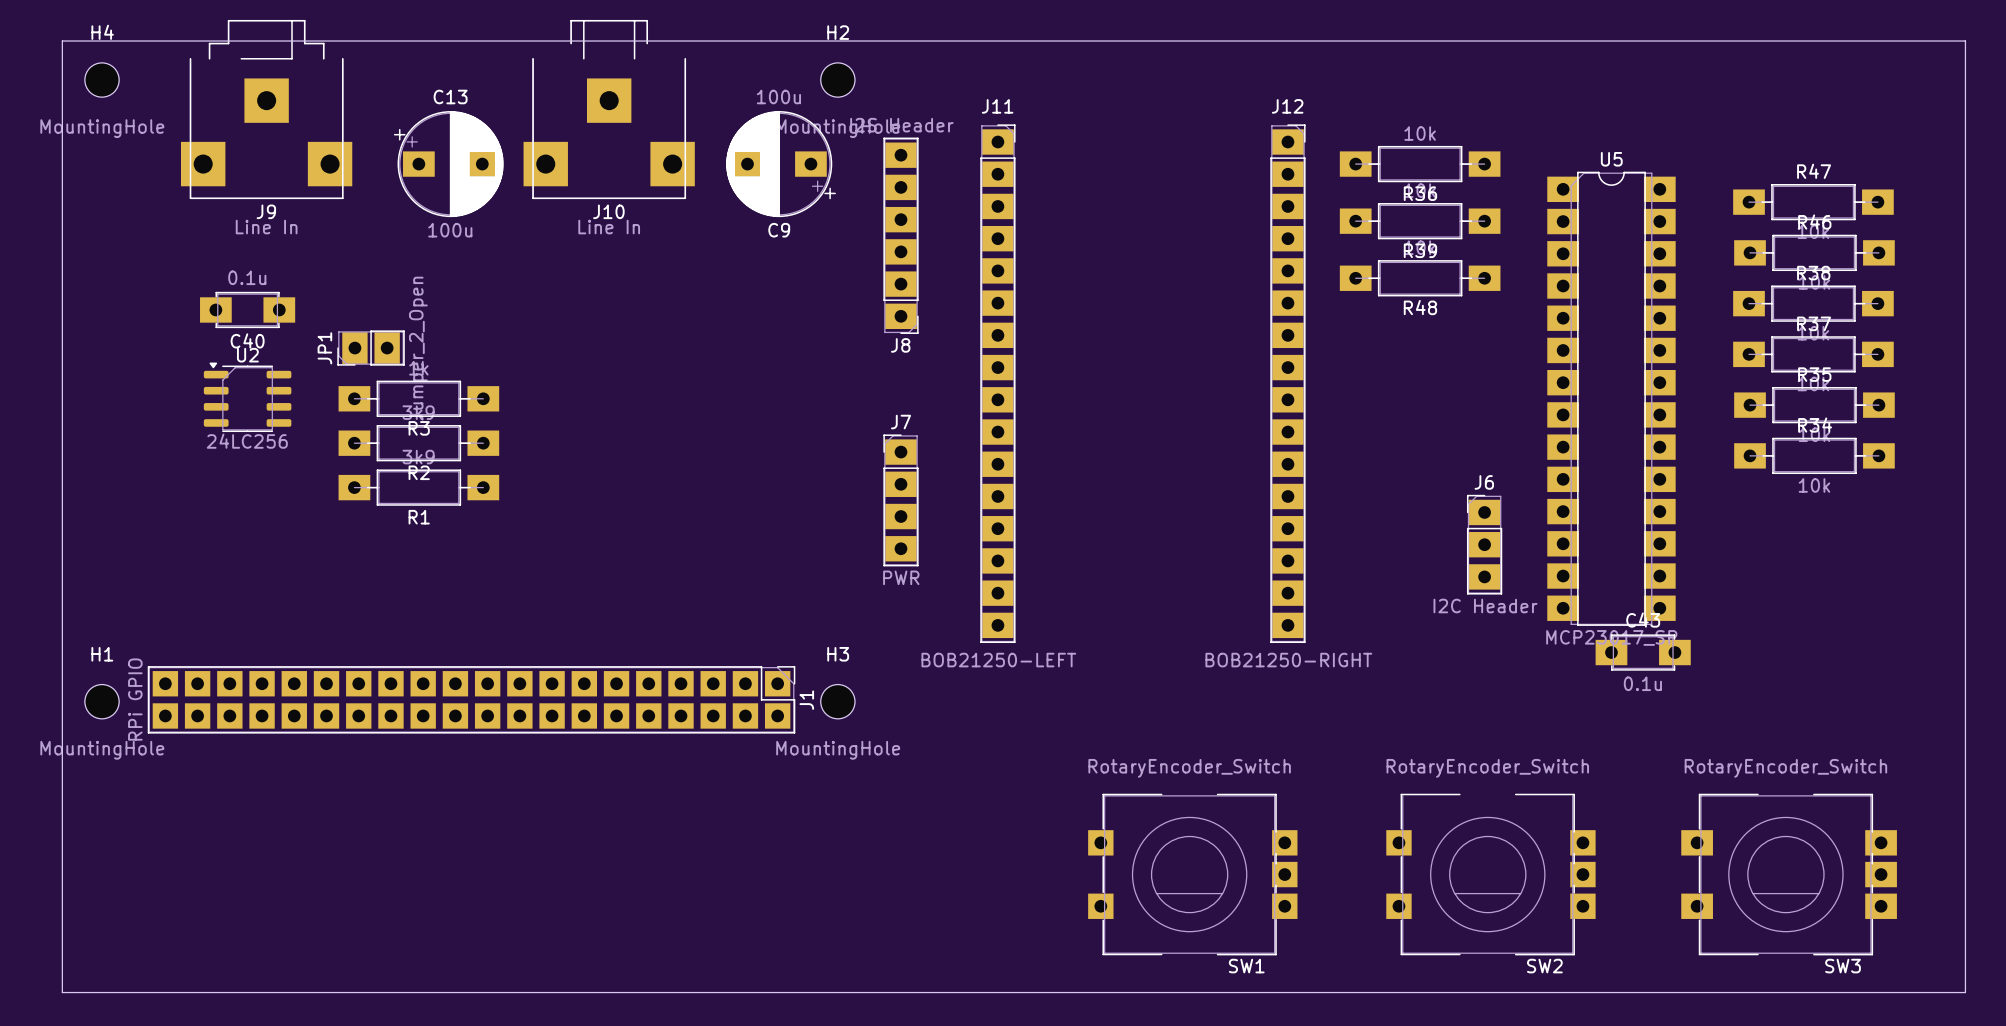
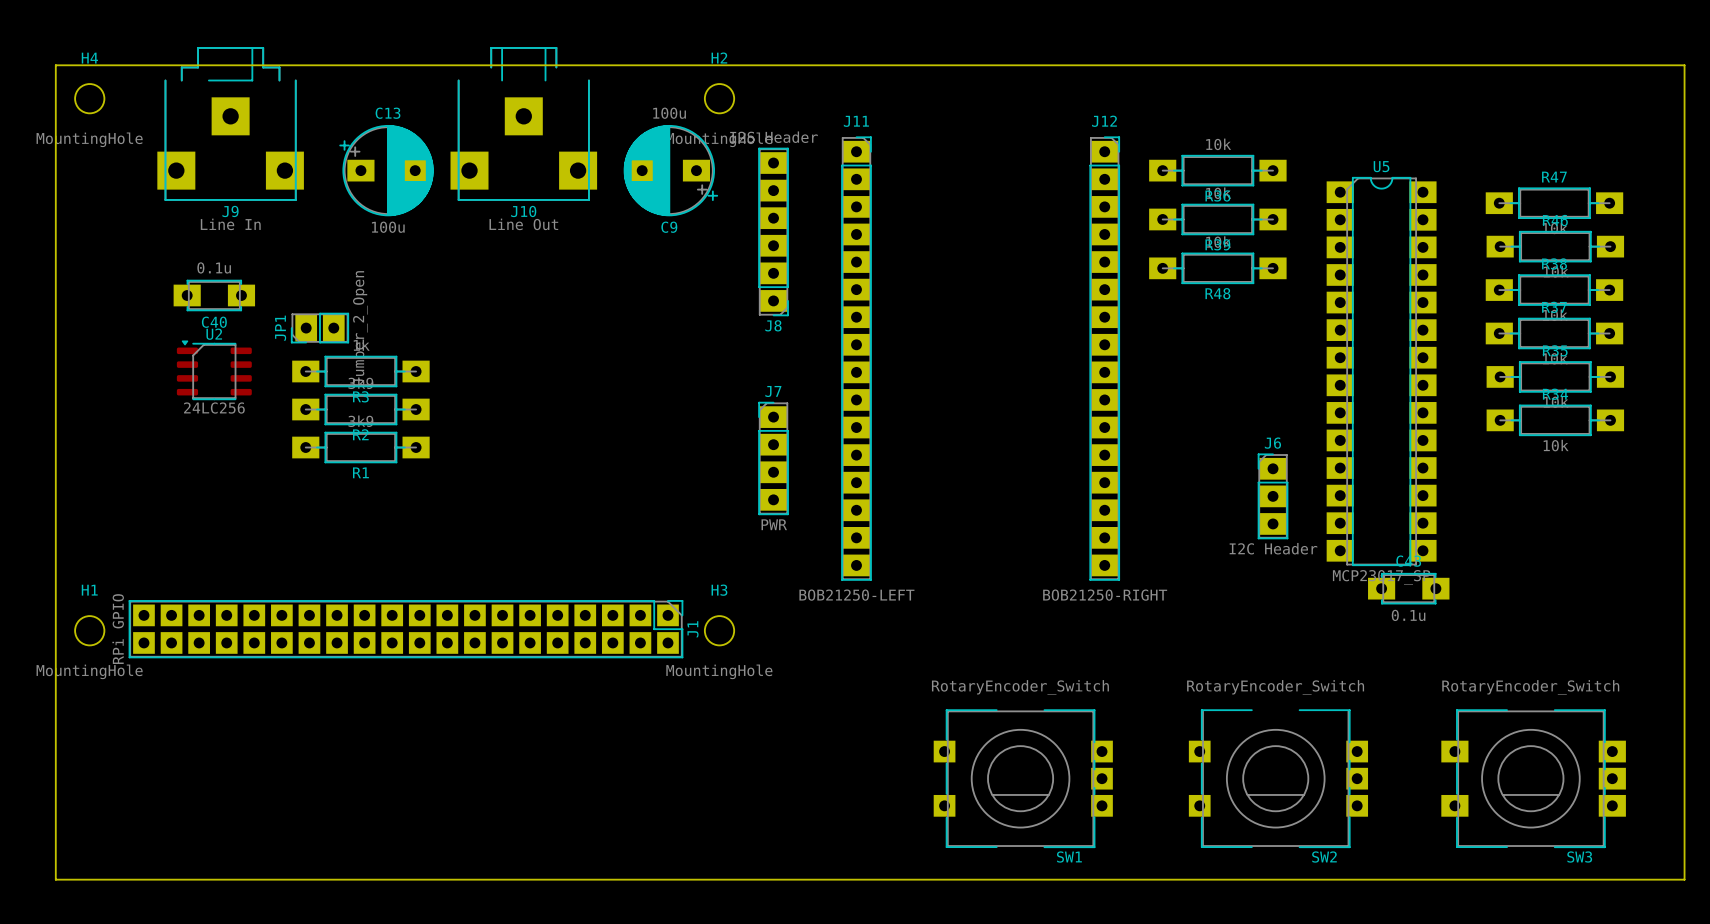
J10 value: Line In (609, 227) -> Line Out (523, 224)

